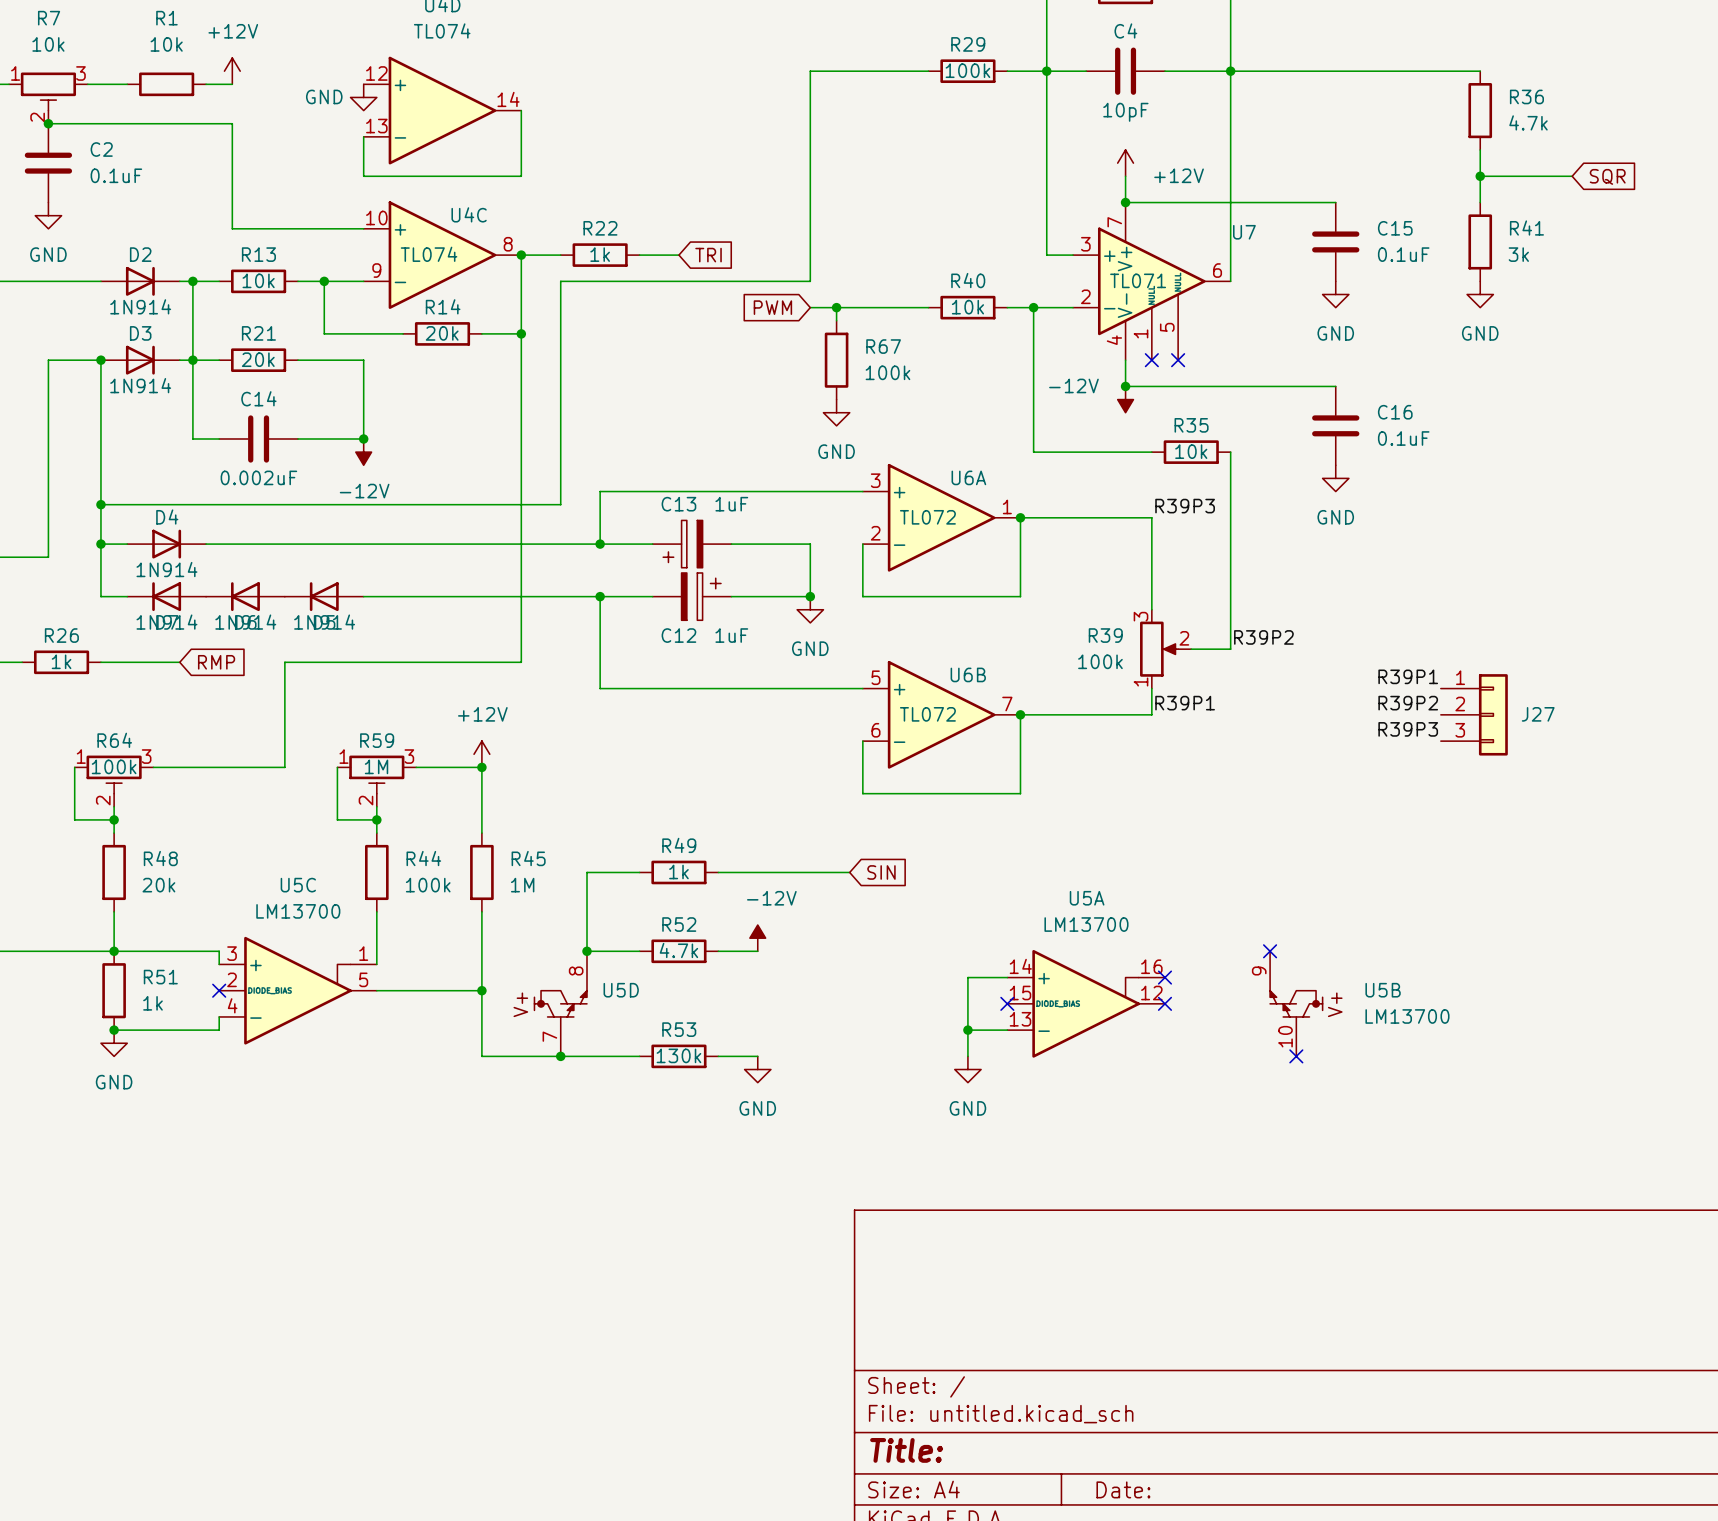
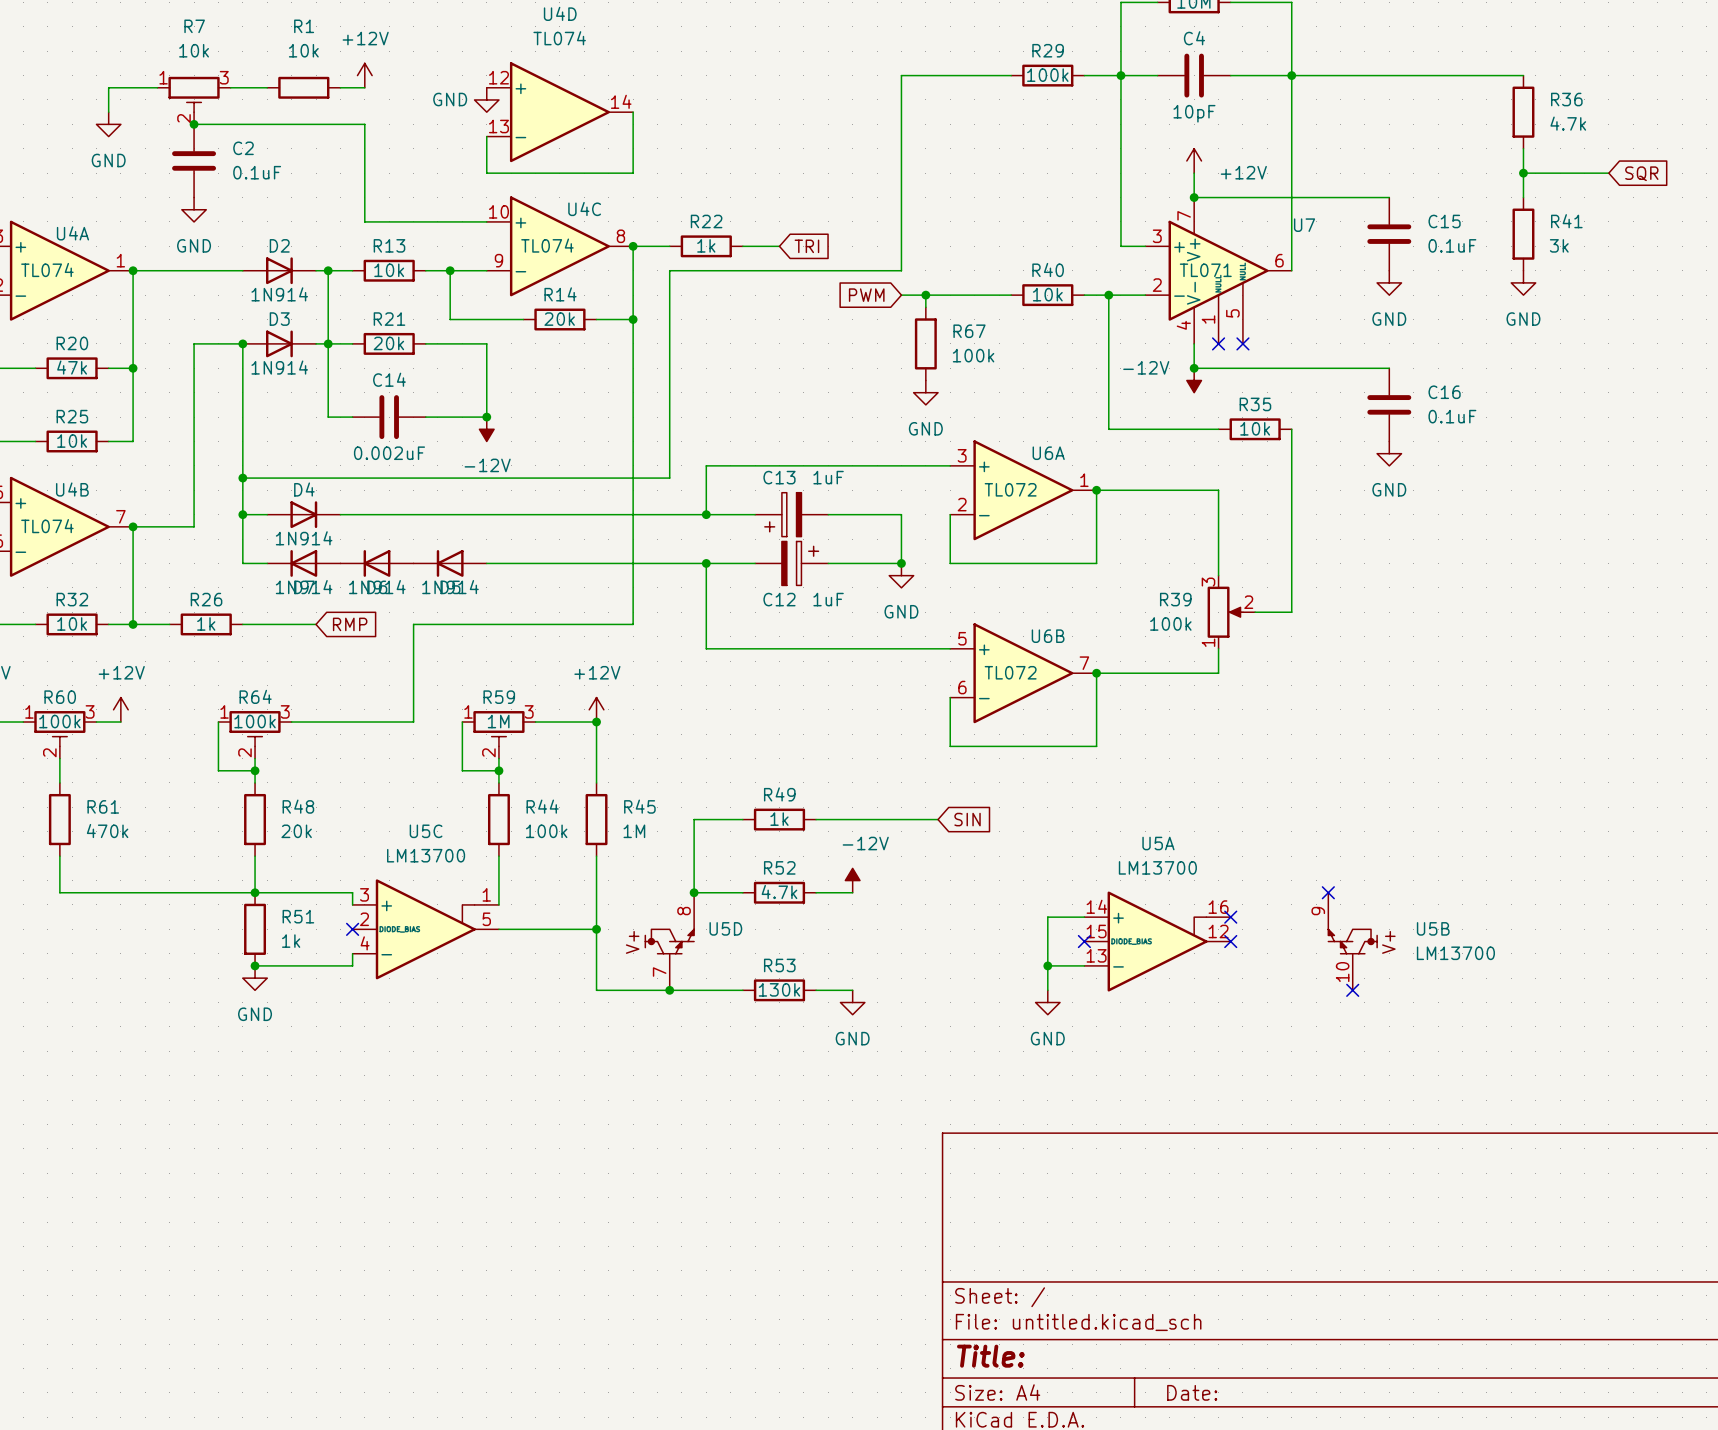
label: R39P3 (1185, 506) -> none
label: R39P2 (1263, 637) -> none
label: R39P1 (1408, 676) -> none
label: R39P1 (1185, 703) -> none
label: R39P2 (1408, 703) -> none
J27: (1474, 714) -> none
label: R39P3 (1408, 729) -> none

